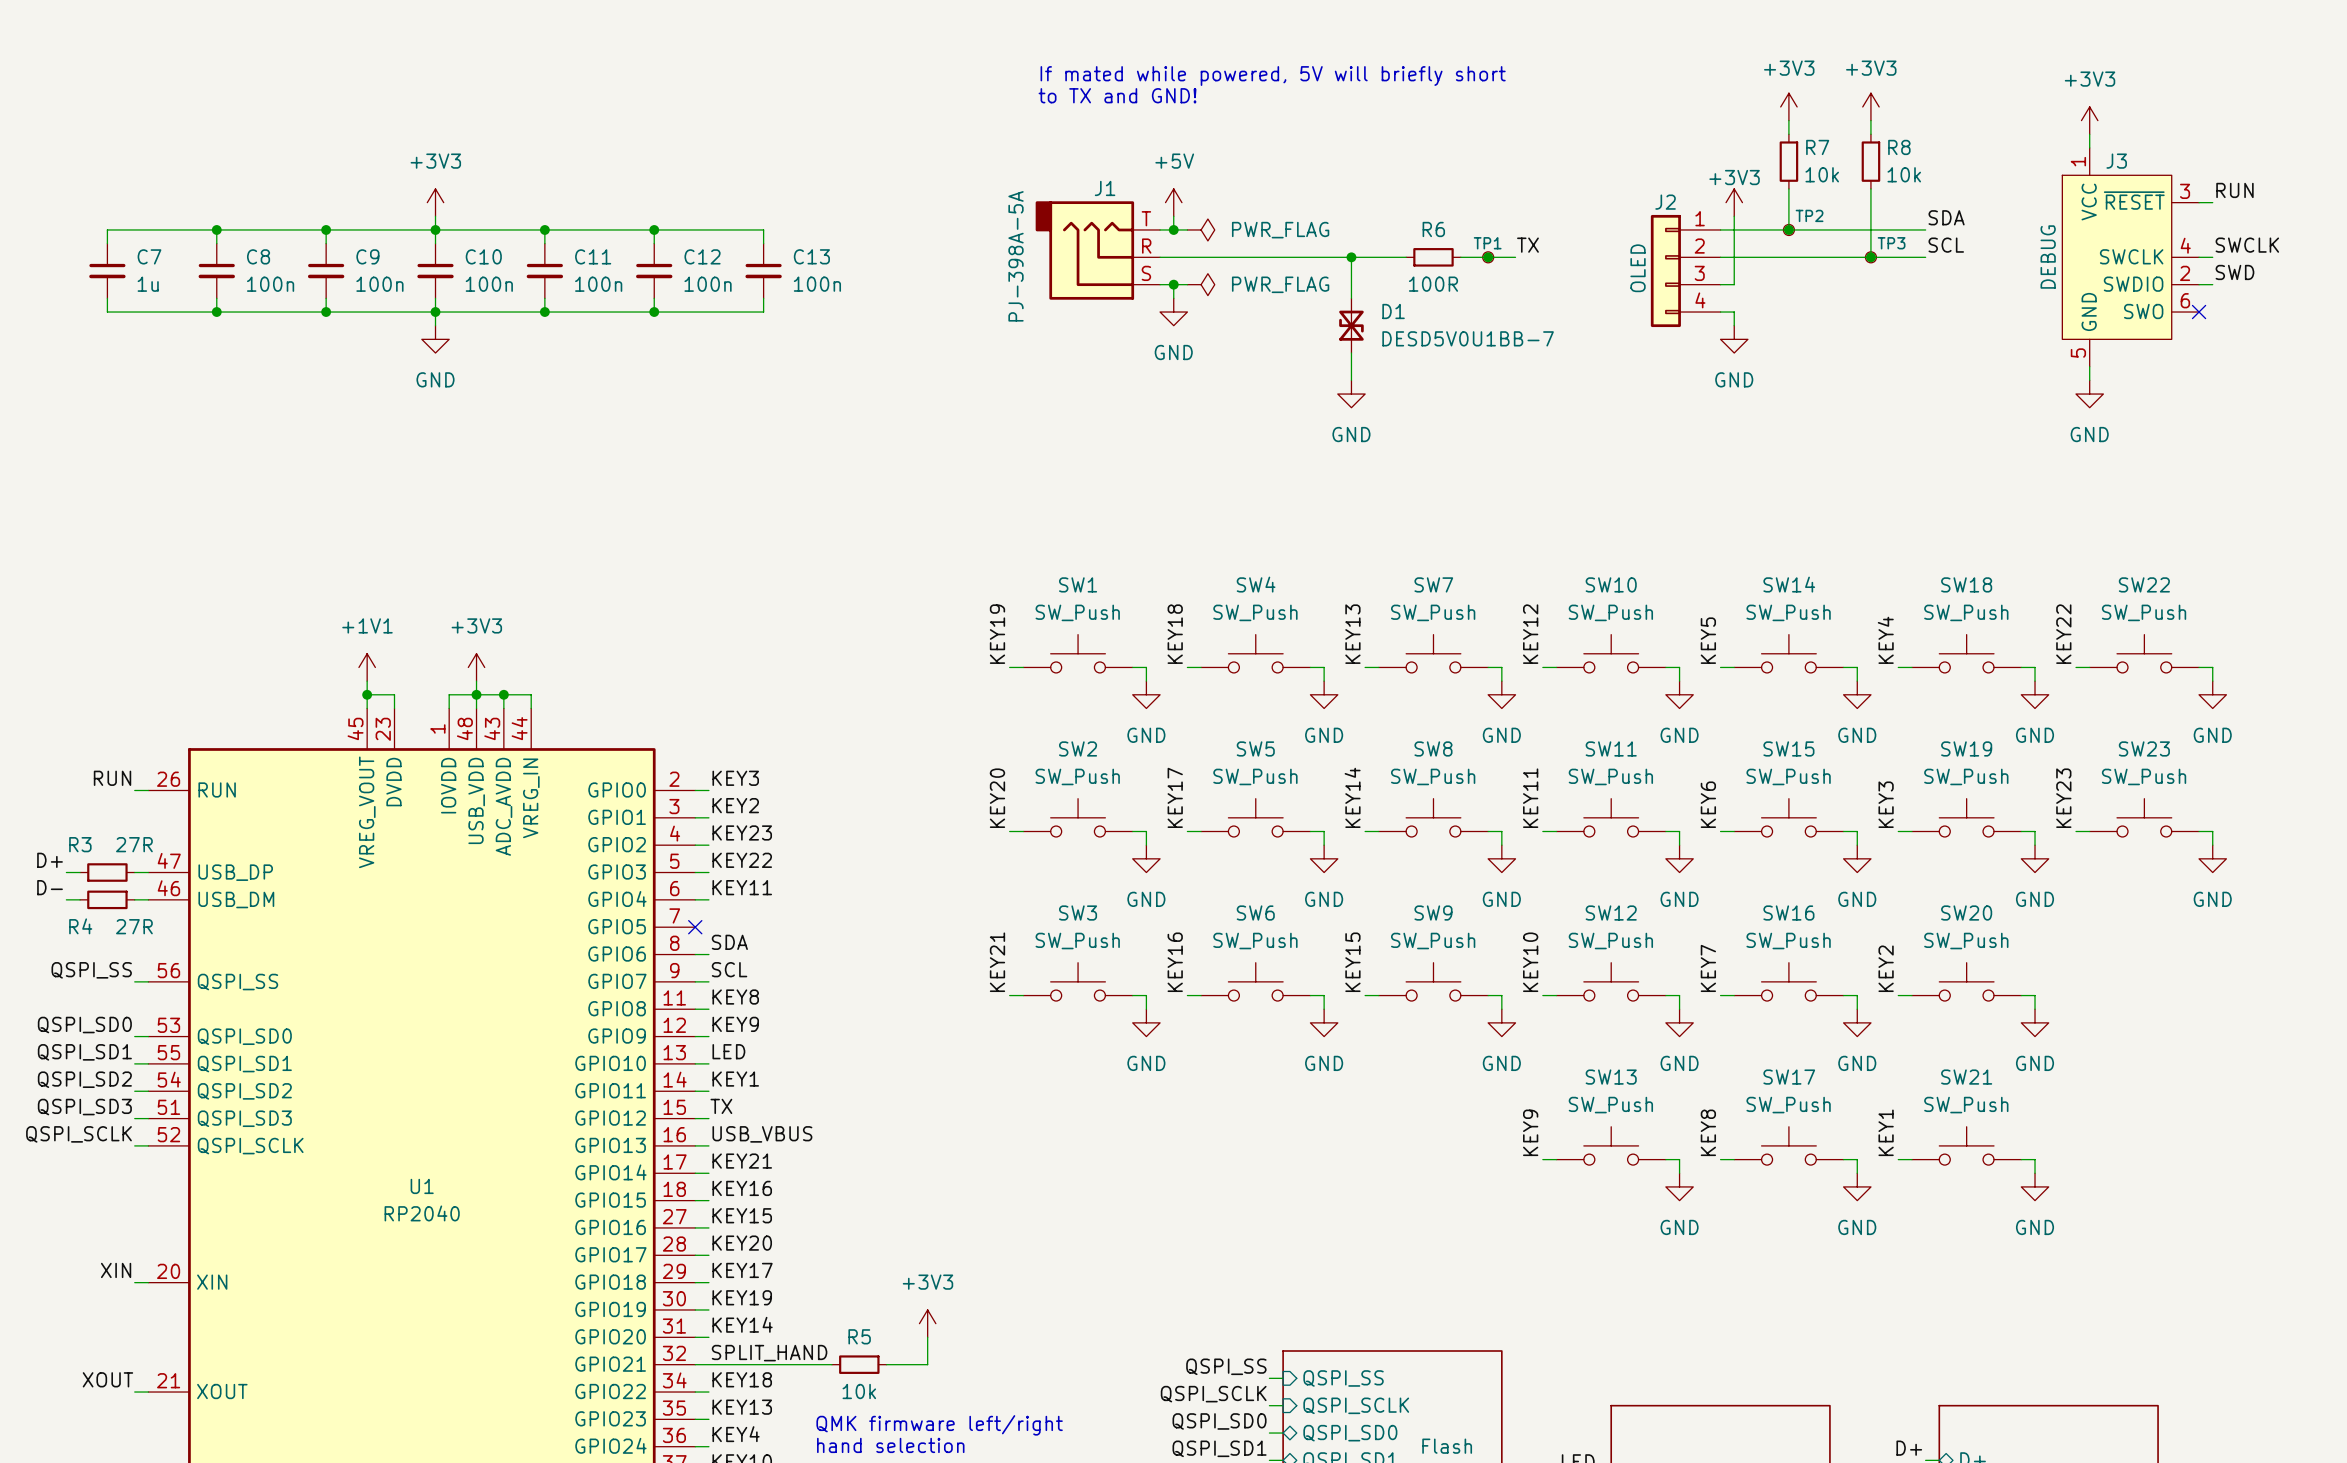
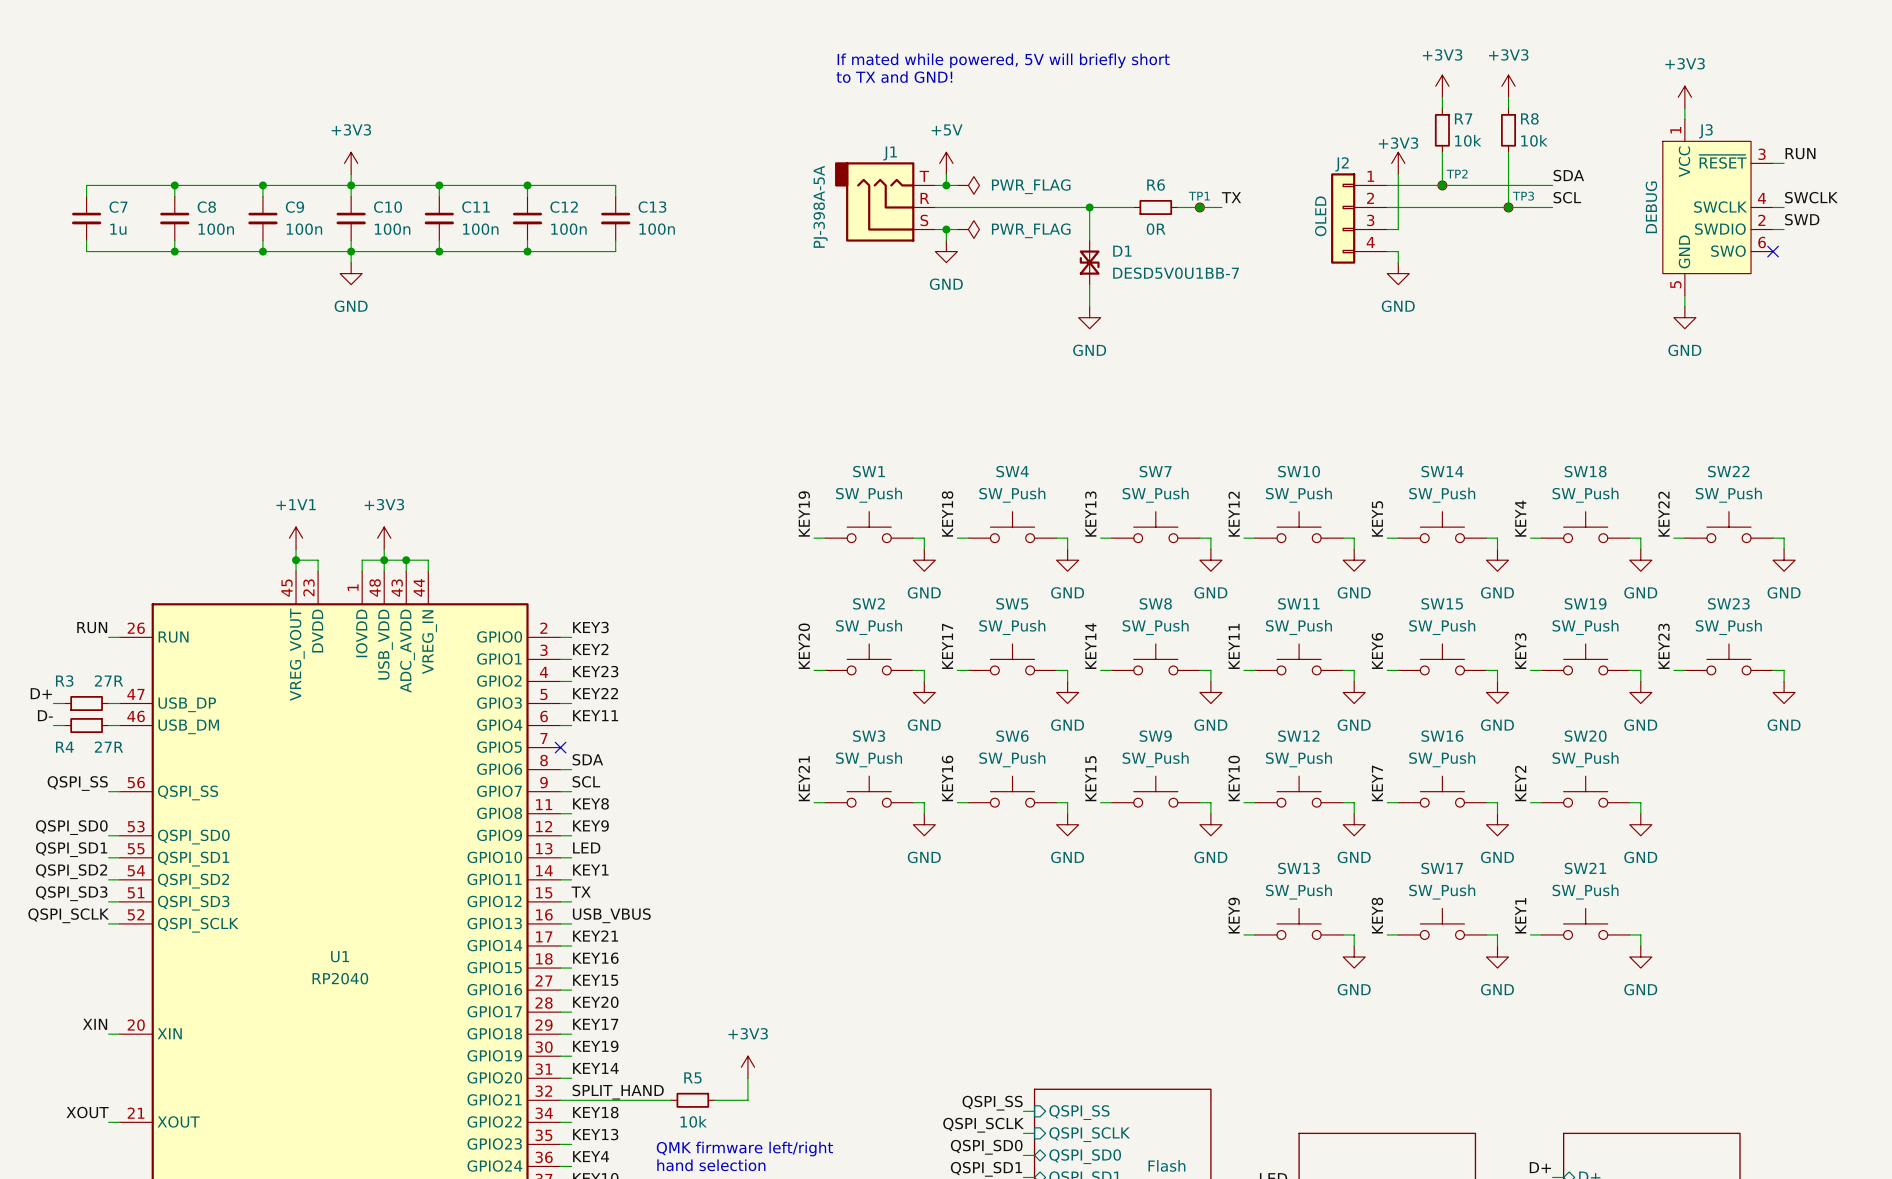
R6 value: 100R (1433, 284) -> 0R (1156, 229)

